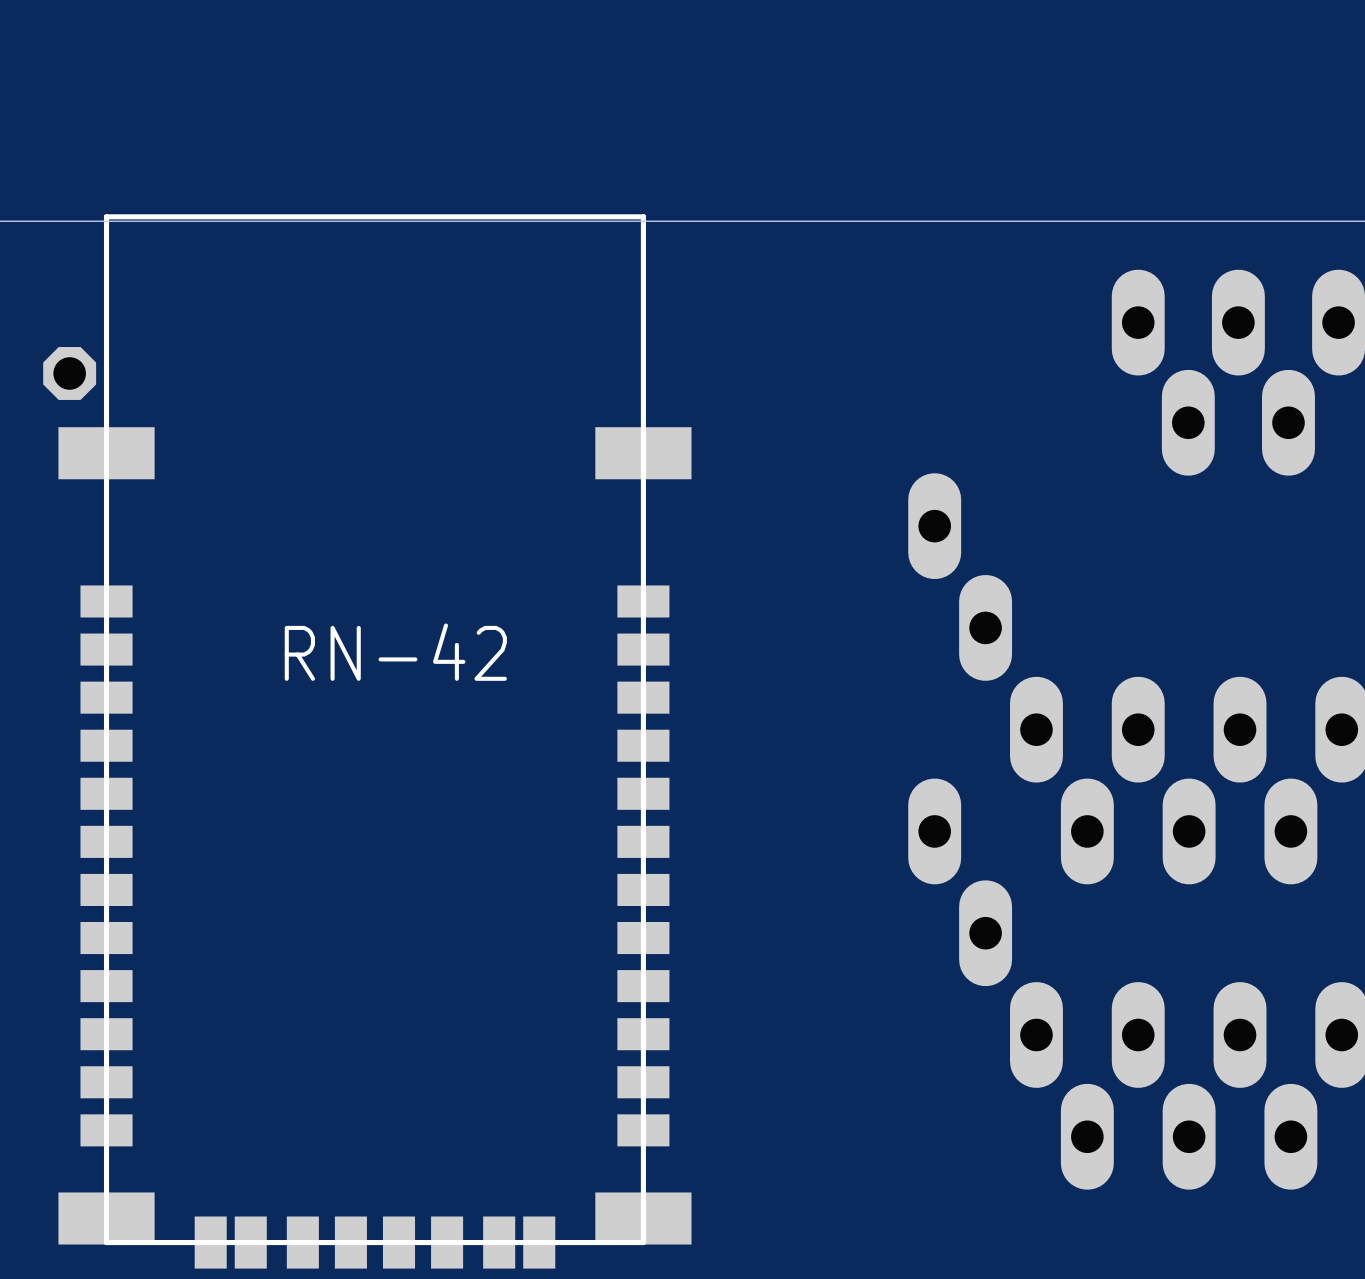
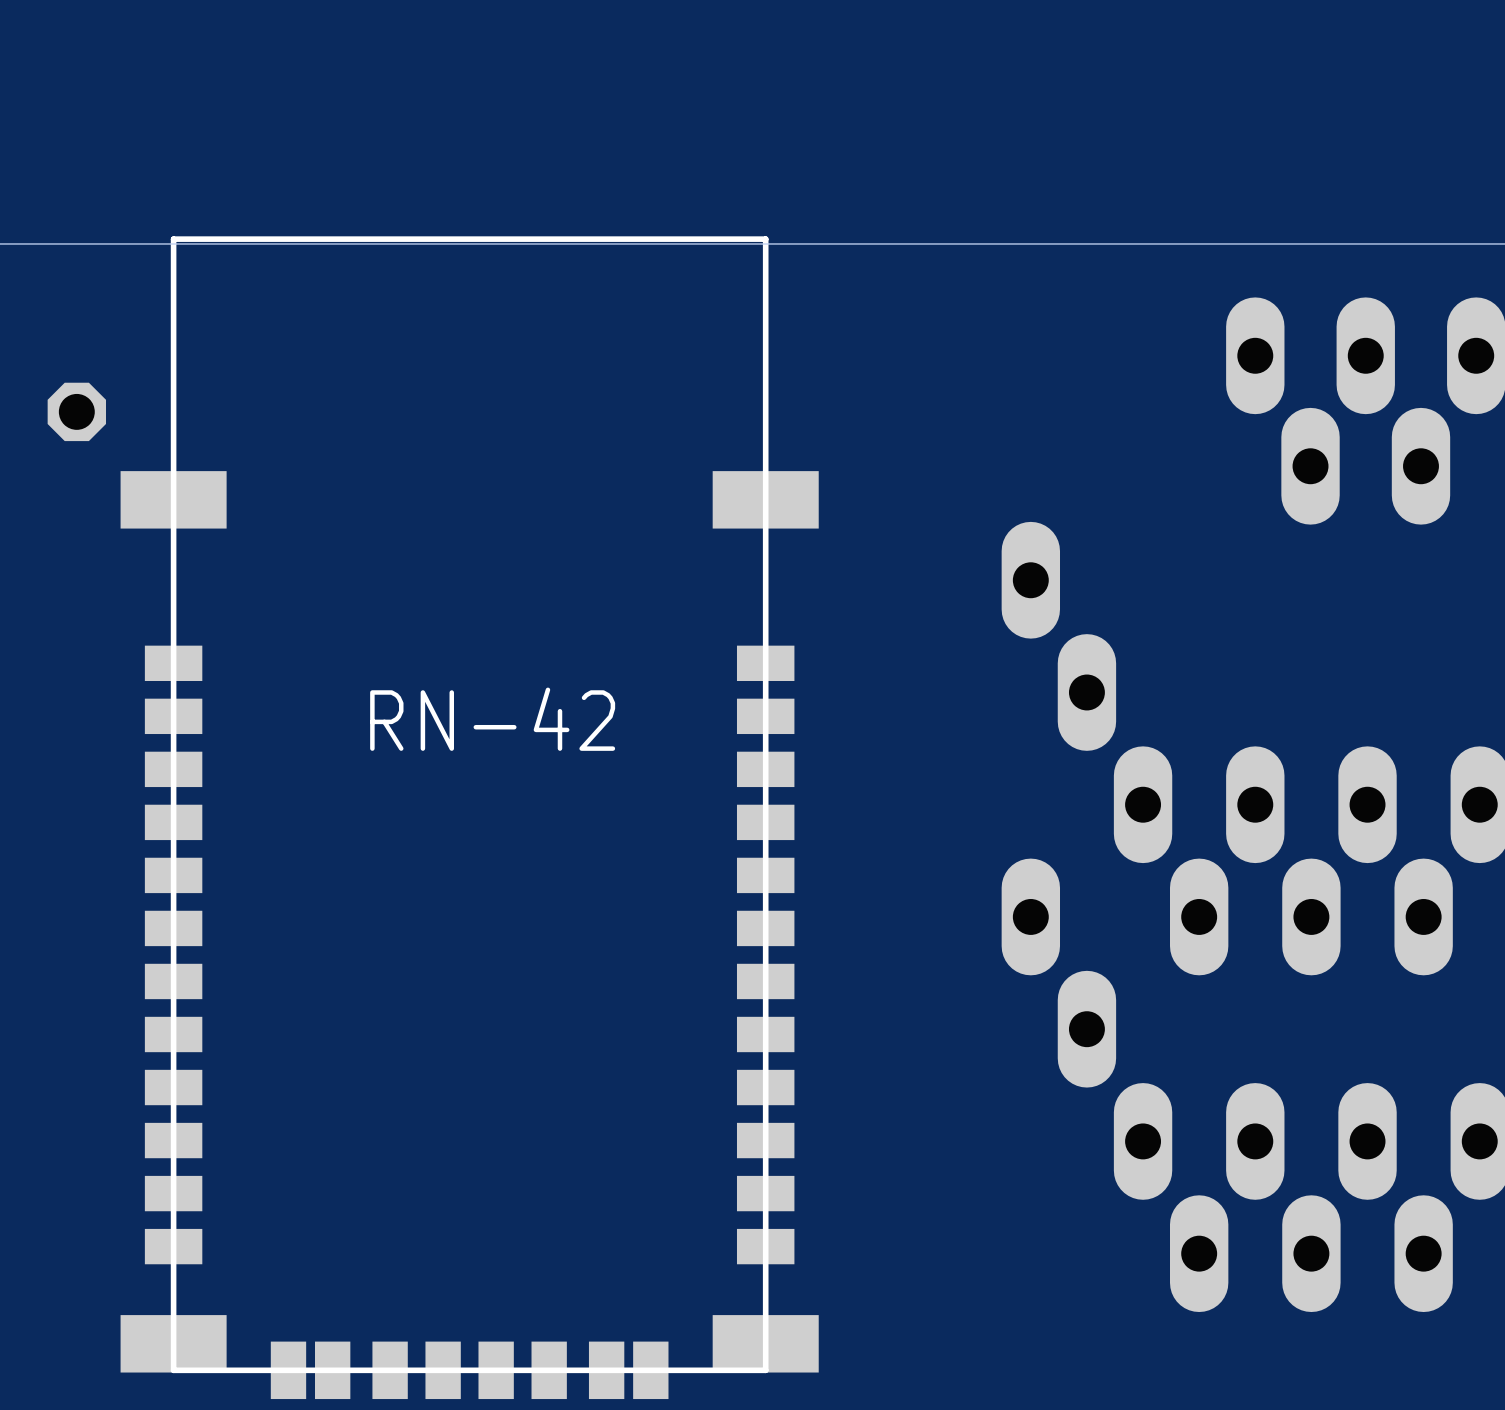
part position: (374, 741) -> (469, 817)

